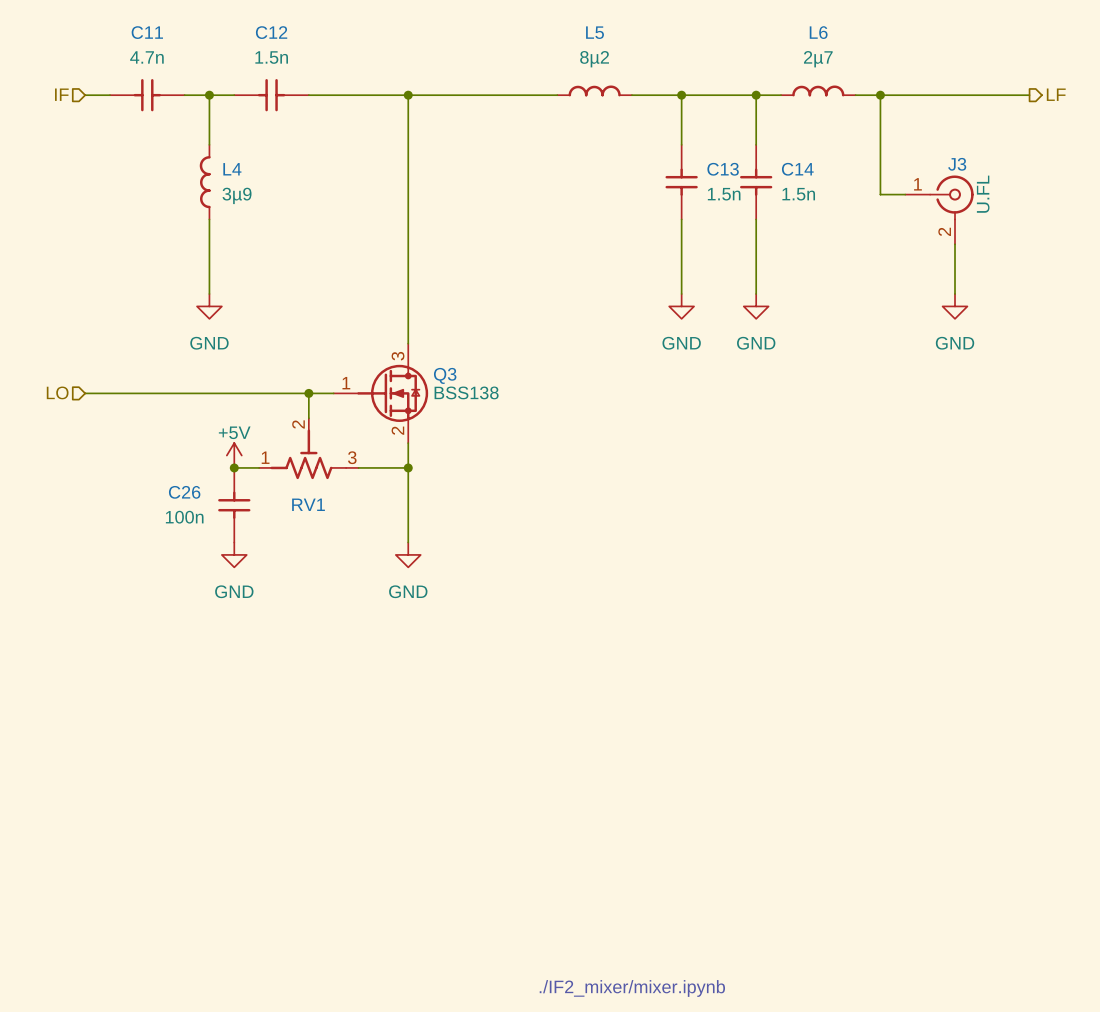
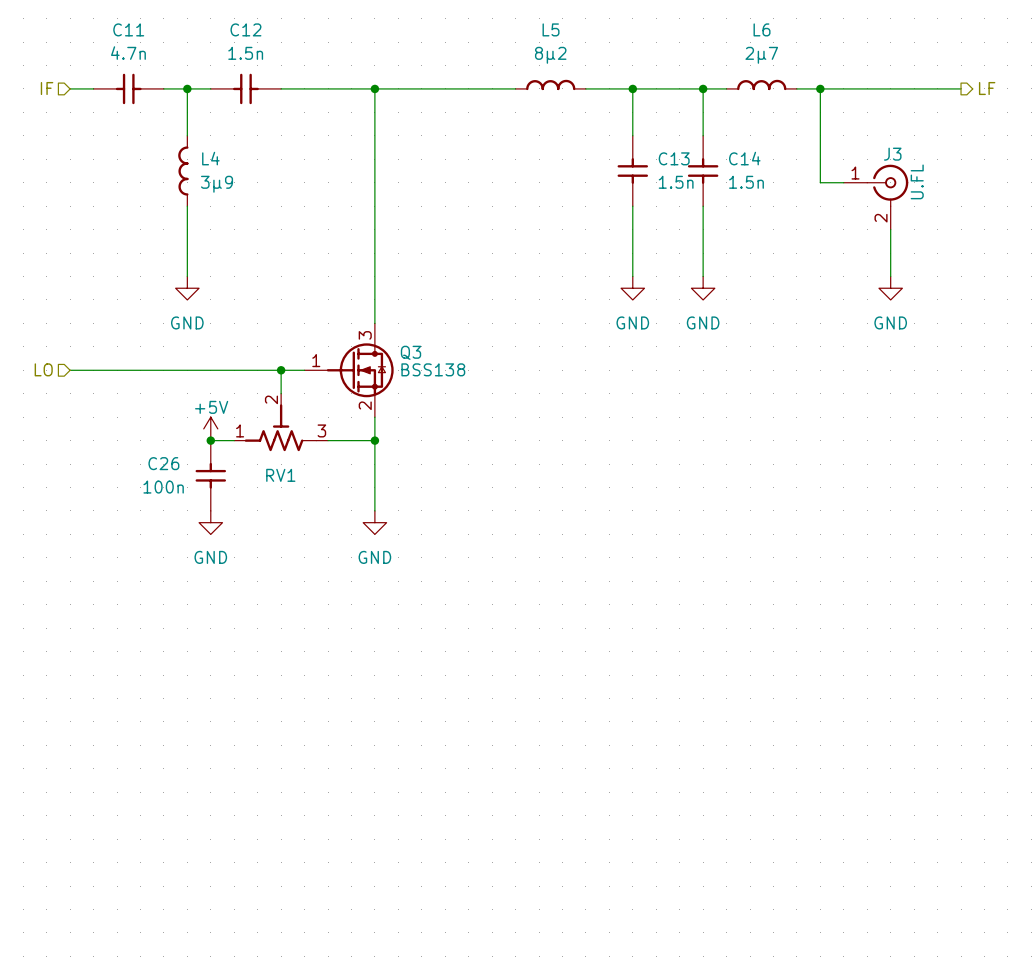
text: ./IF2_mixer/mixer.ipynb (632, 988) -> none

